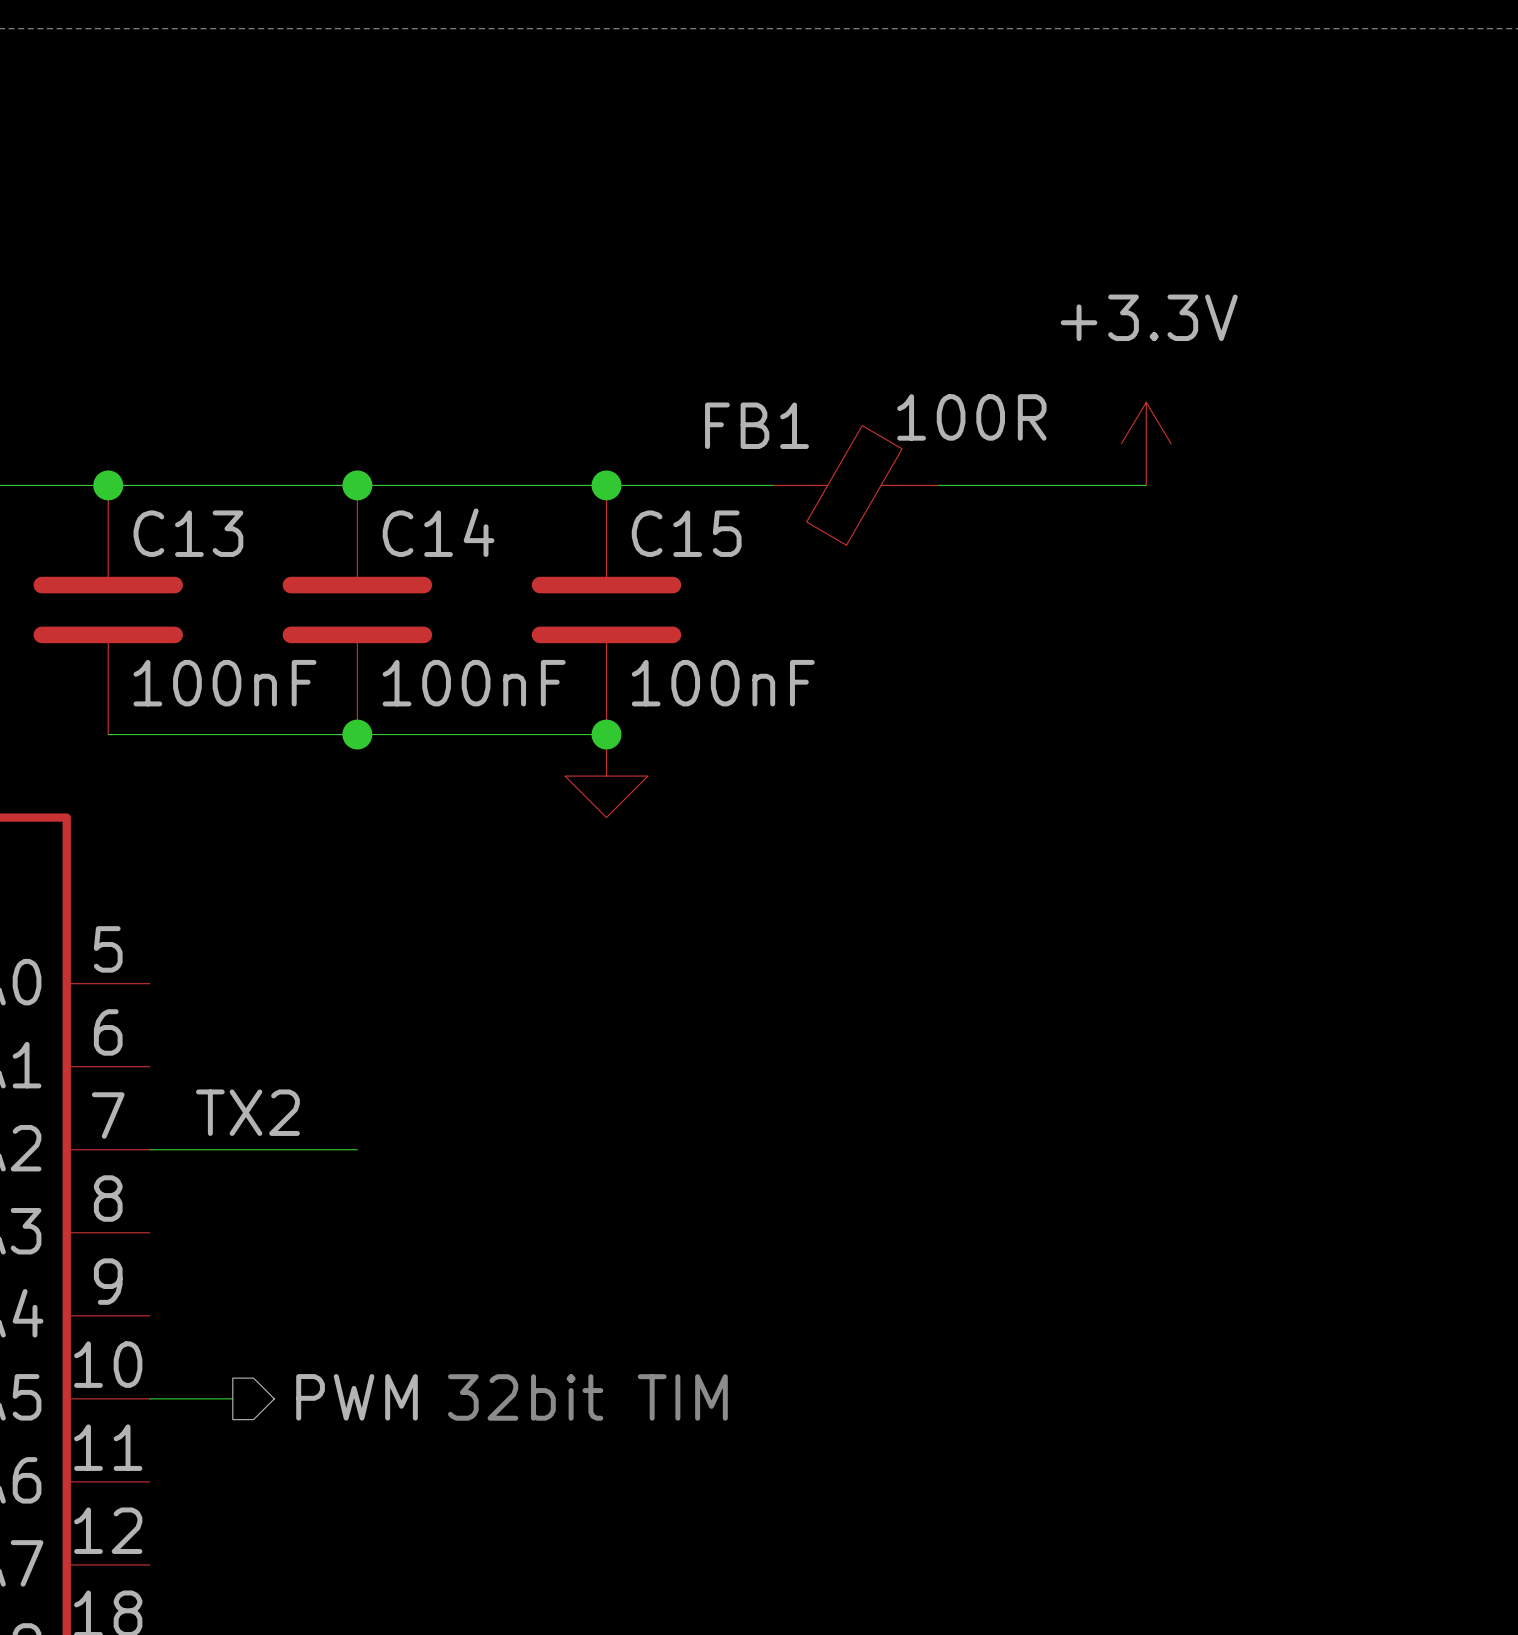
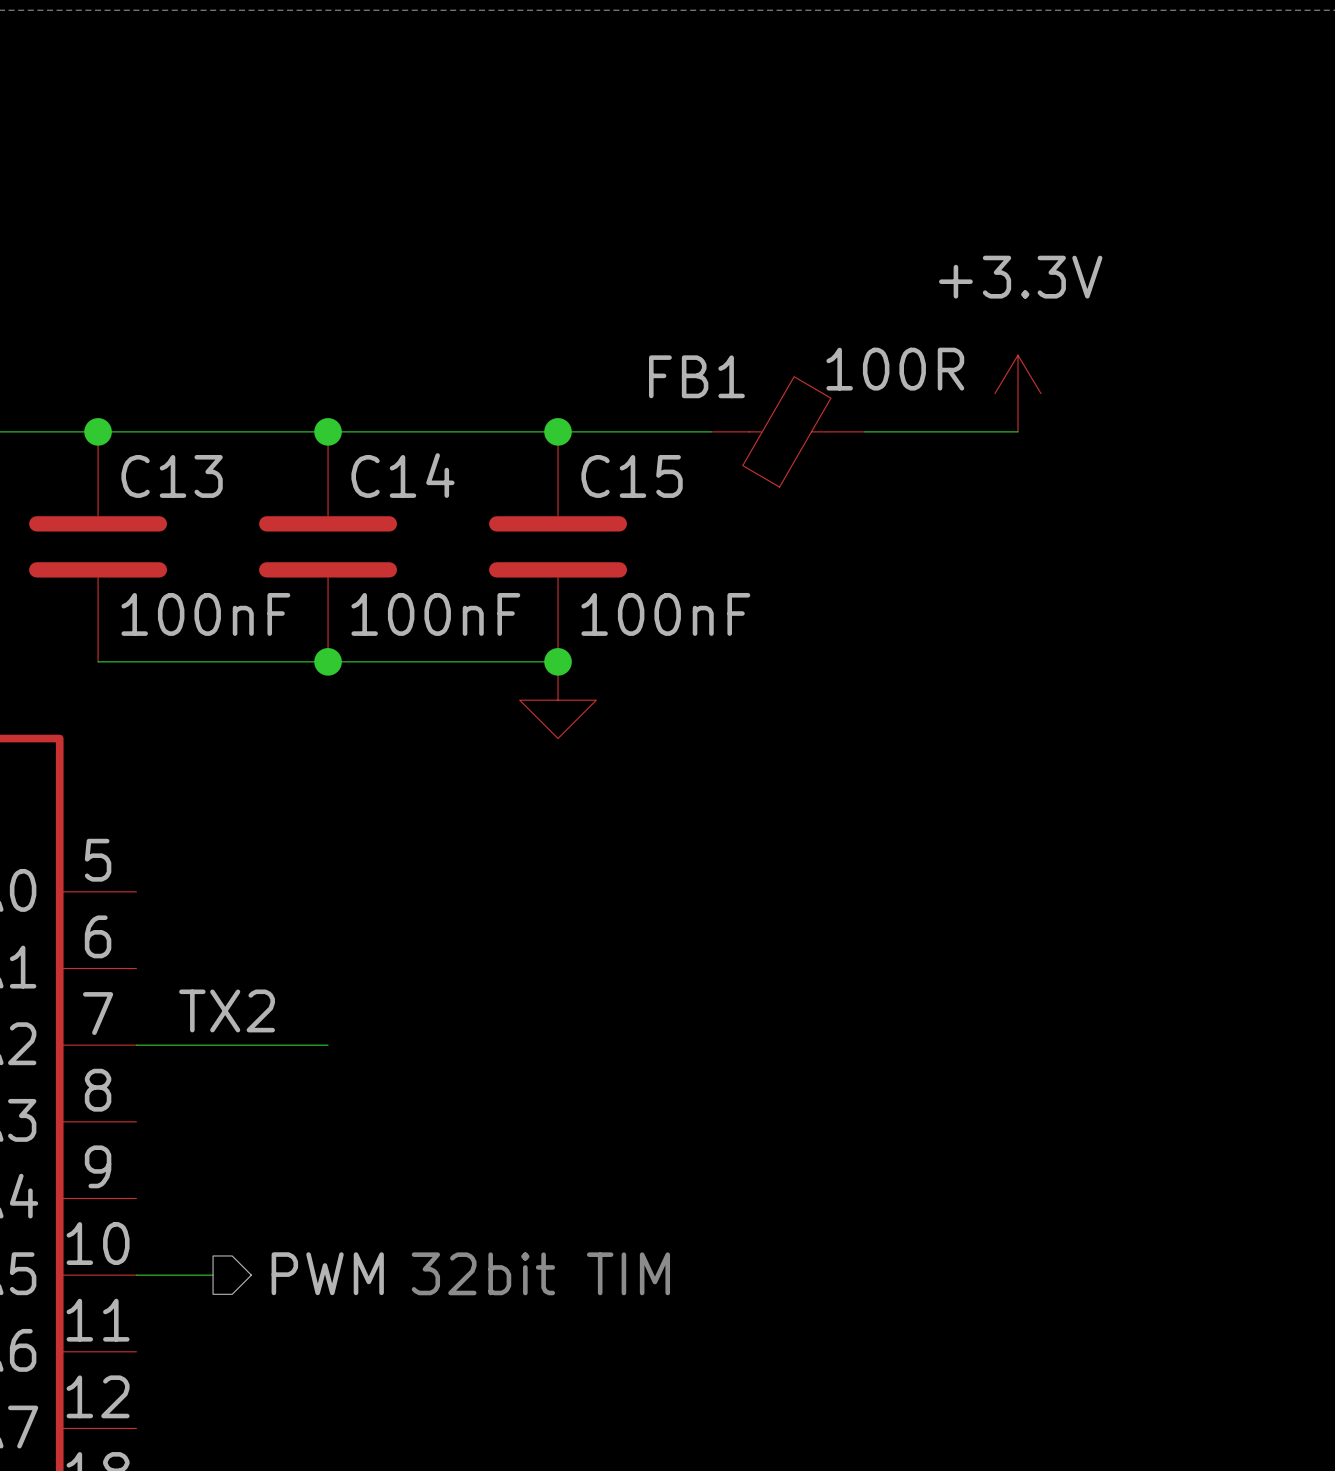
power symbol position: +3.3V (1146, 443) -> +3.3V (1017, 393)
wire: (1104, 485) (1146, 485) -> none

